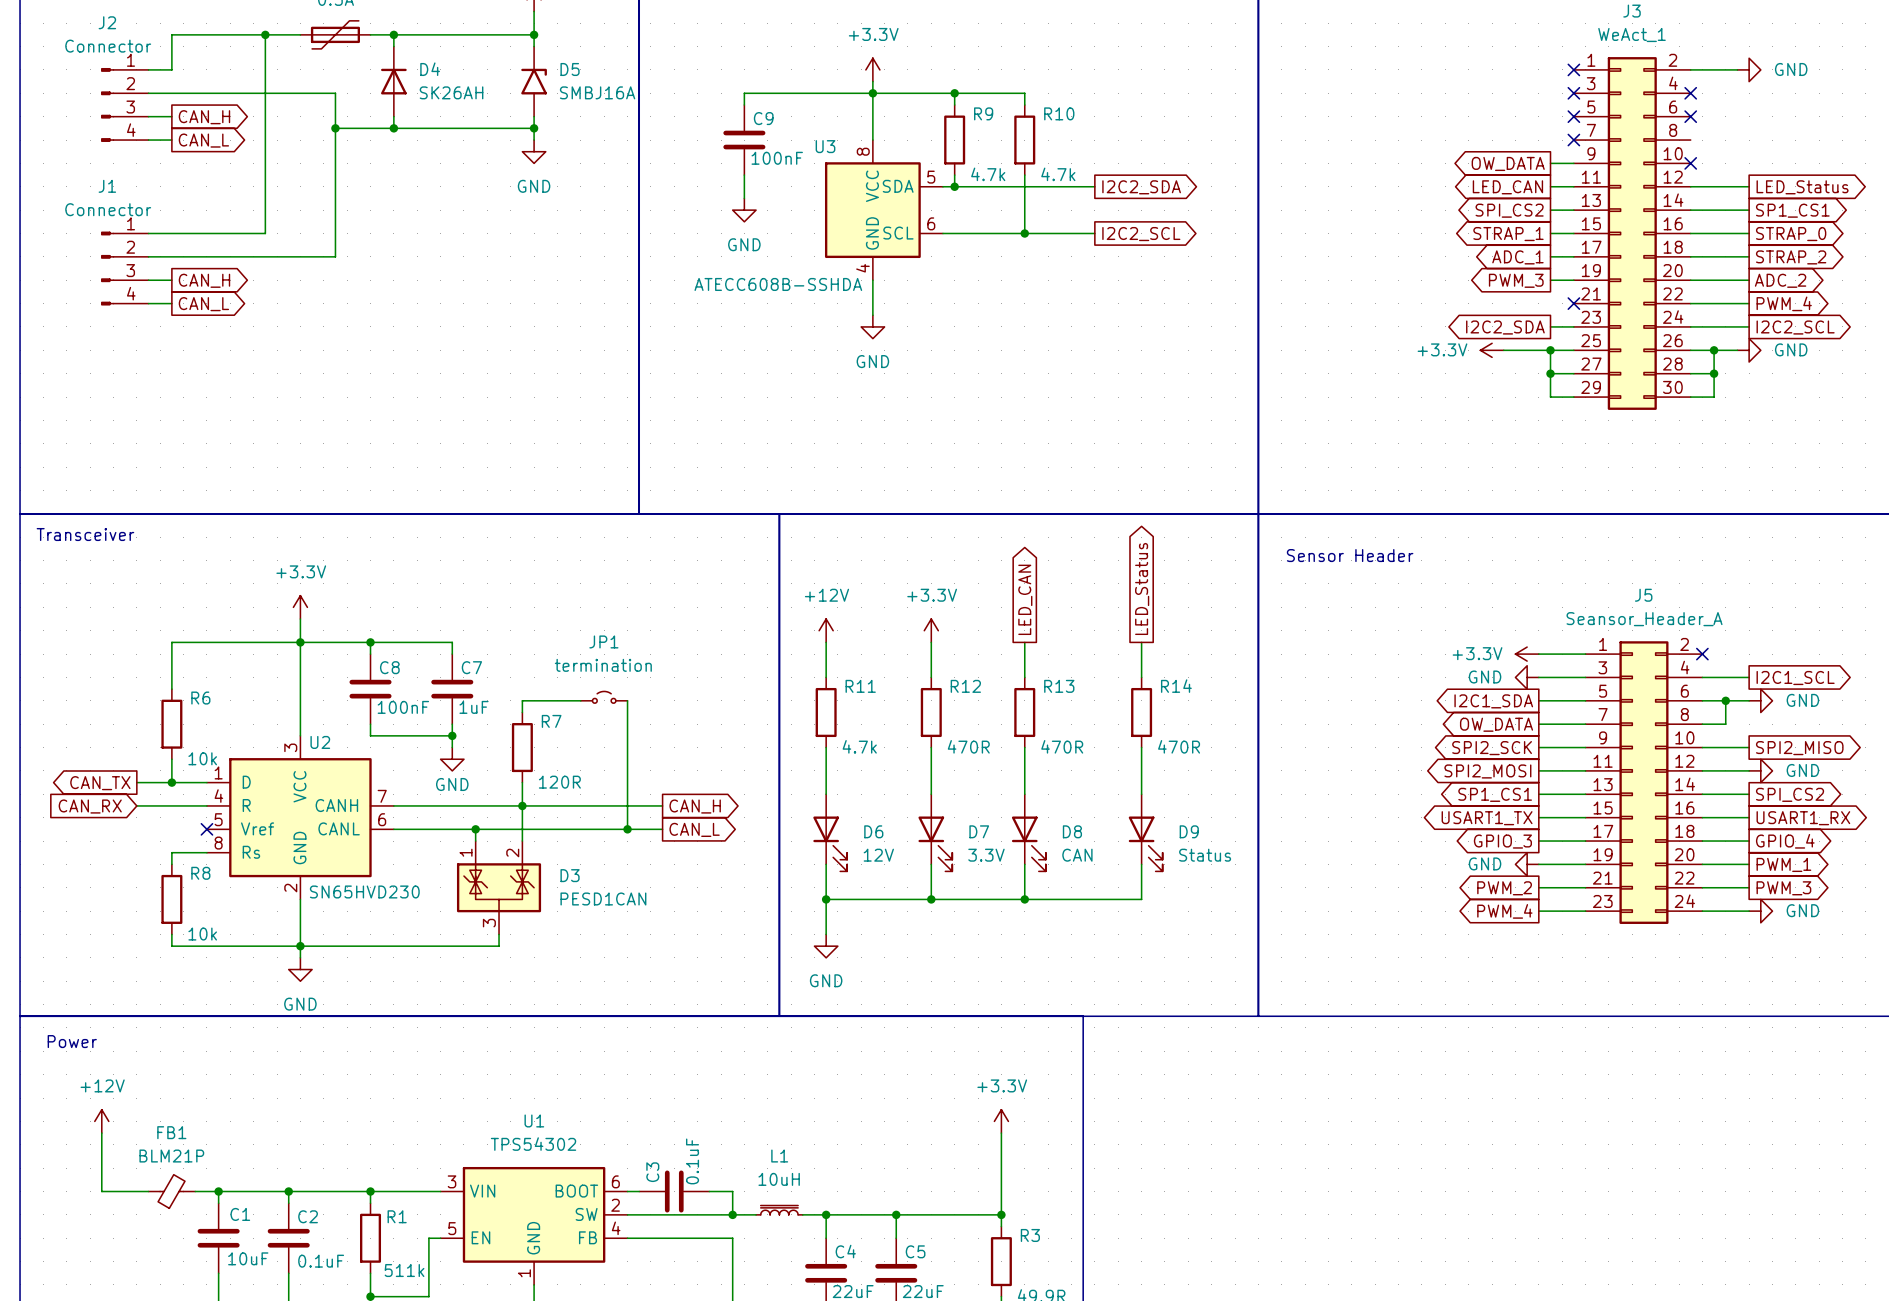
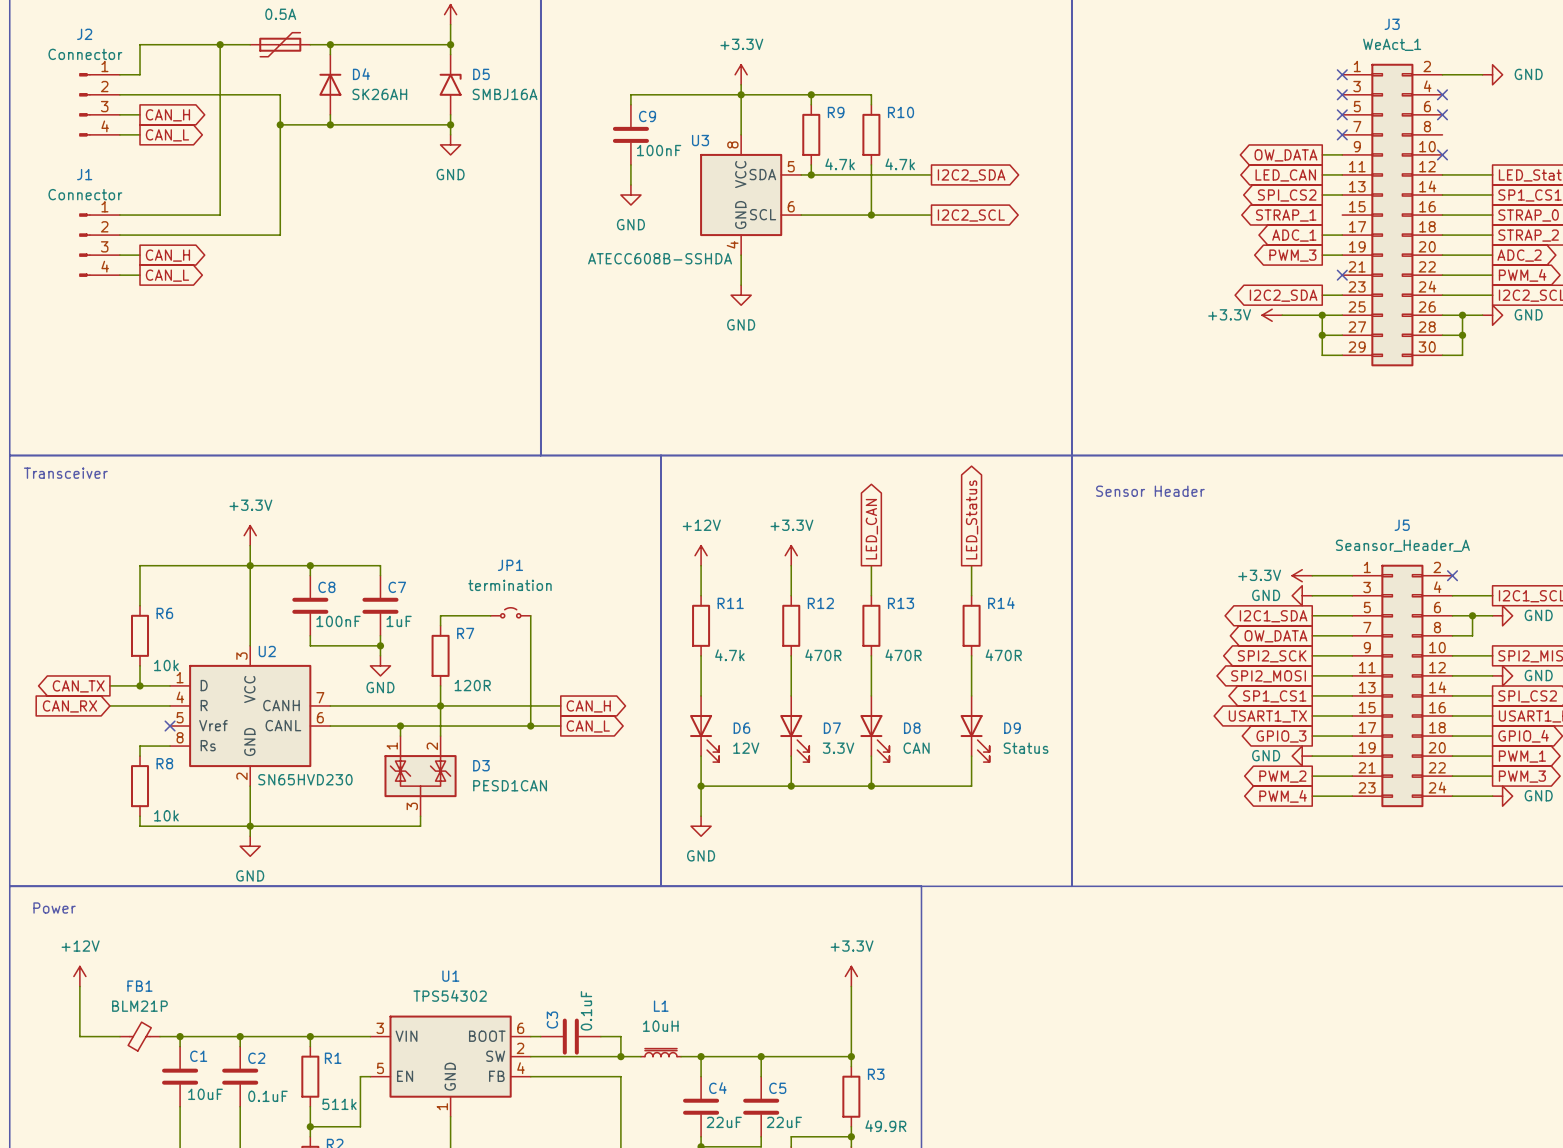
wire: (1550, 233) (1573, 233) -> none

